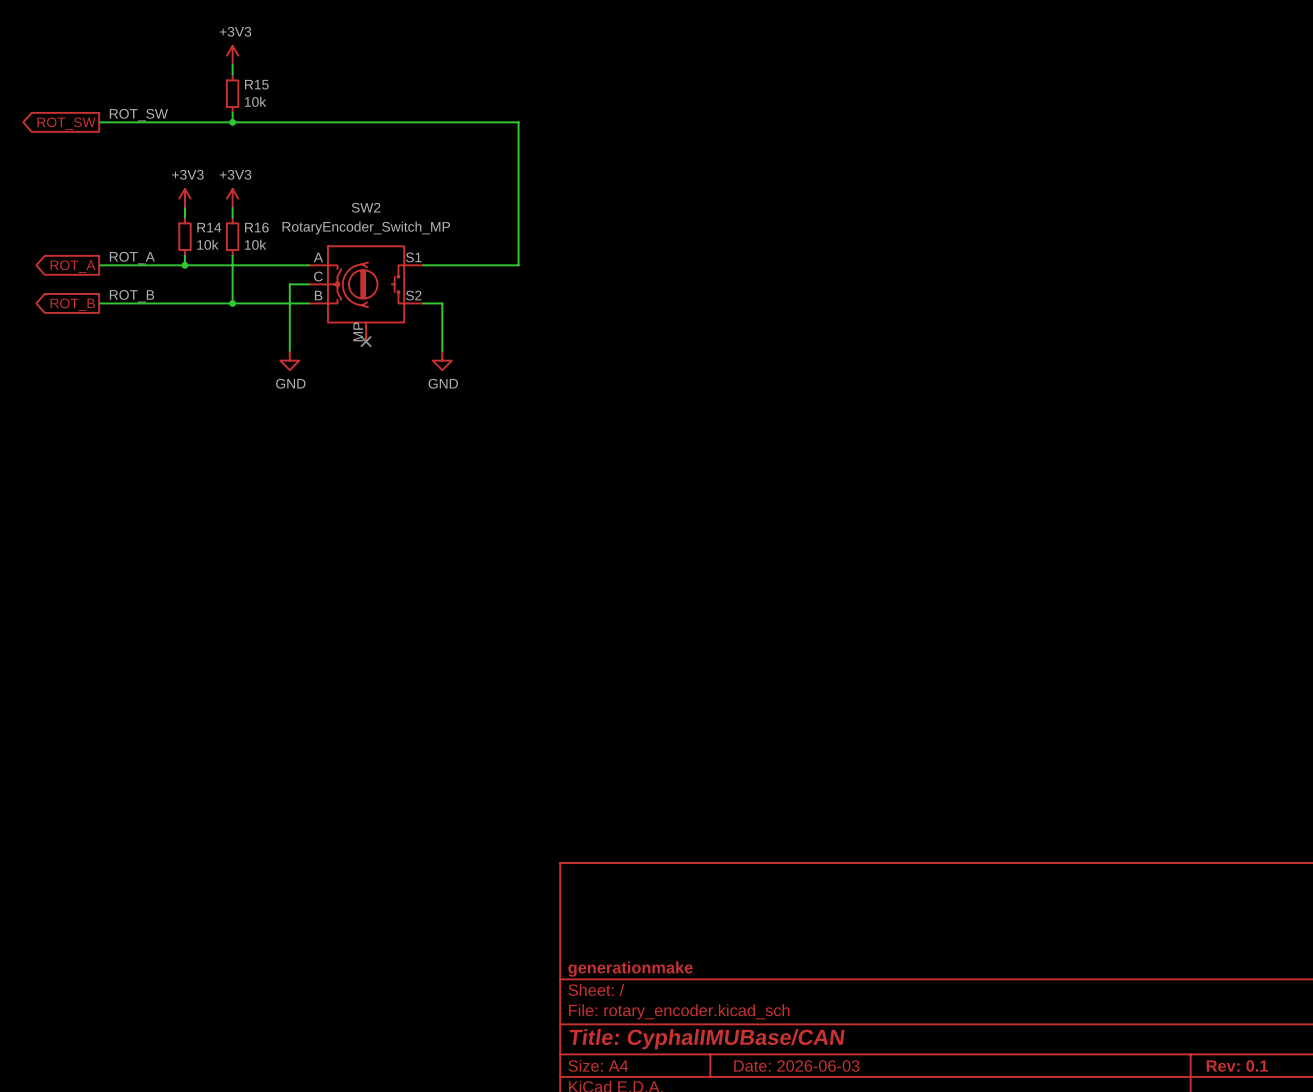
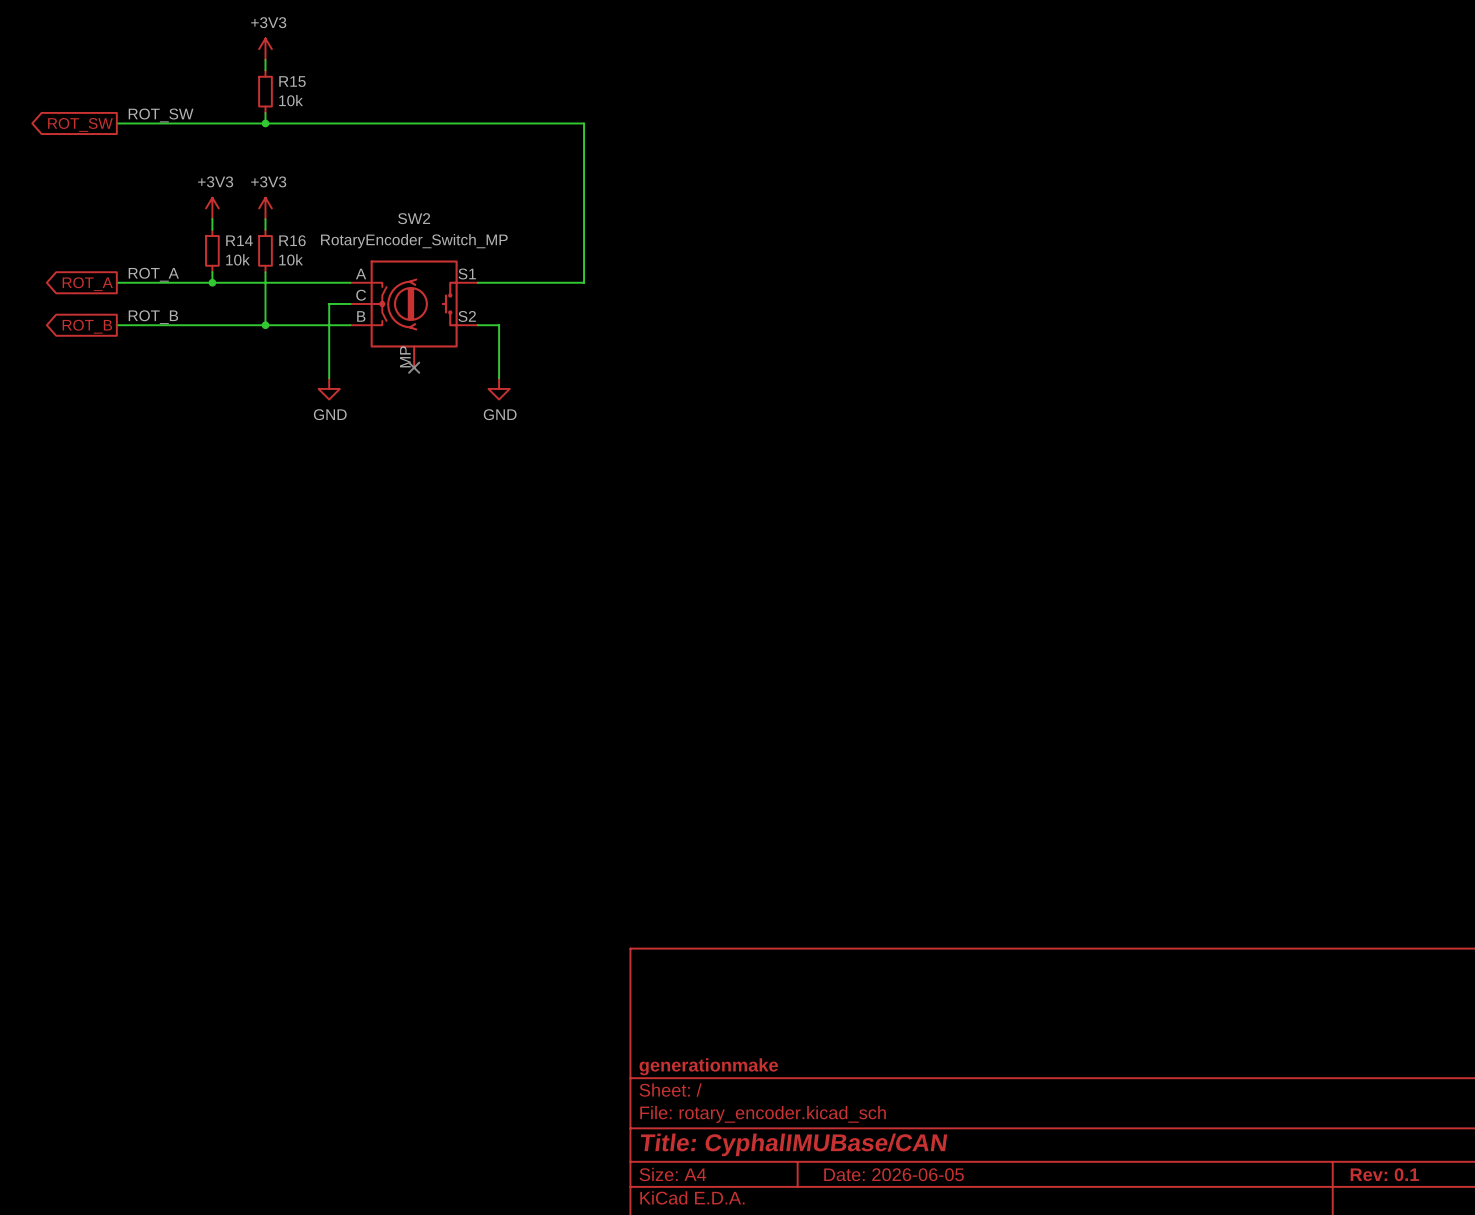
title block: Date: 2026-06-03 (796, 1065) -> Date: 2026-06-05 (894, 1174)

